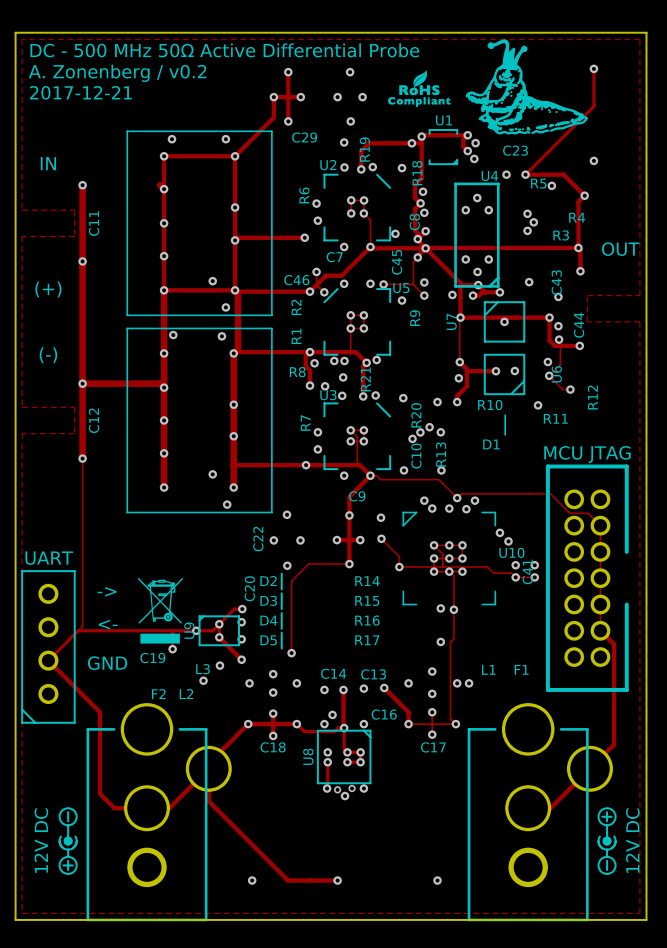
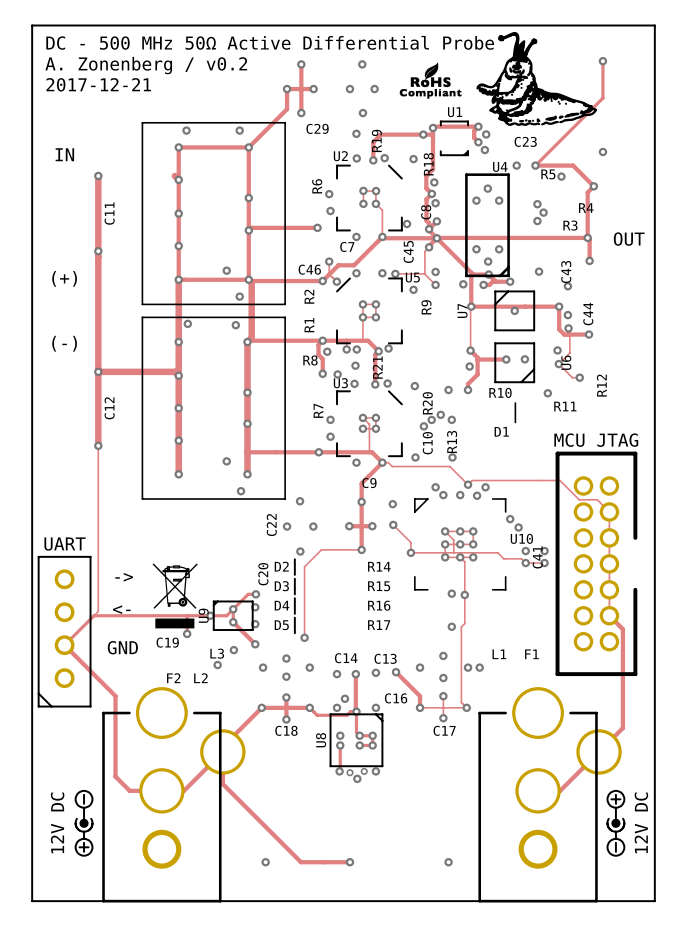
zone outline: (22, 39) (22, 210) (74, 210) (74, 236) (22, 236) (22, 407) (74, 407) (74, 433) (22, 433) (22, 913) (639, 913) (639, 321) (587, 321) (587, 295) (639, 295) (639, 39) (22, 39) -> none

